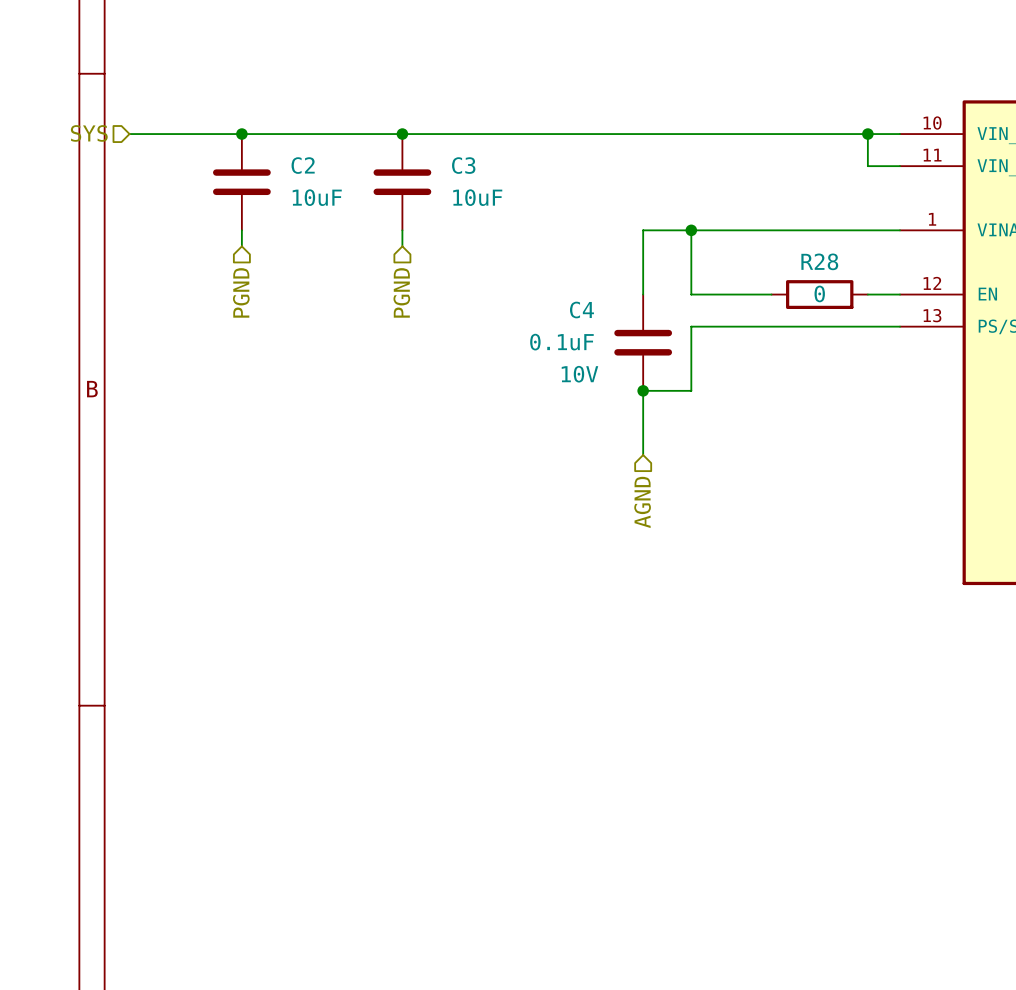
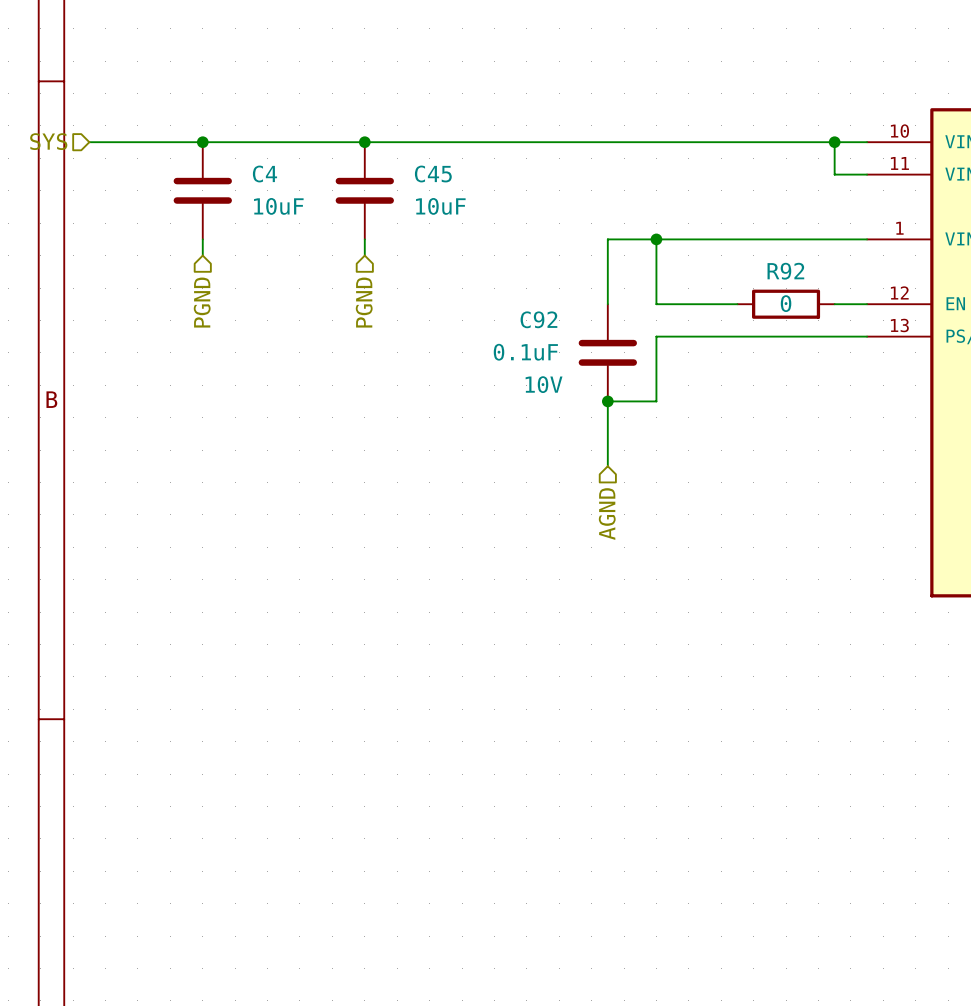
C2 name: C2 (303, 165) -> C4 (264, 174)
C3 name: C3 (463, 165) -> C45 (433, 174)
R28 name: R28 (819, 261) -> R92 (785, 271)
C4 name: C4 (581, 310) -> C92 (538, 319)

